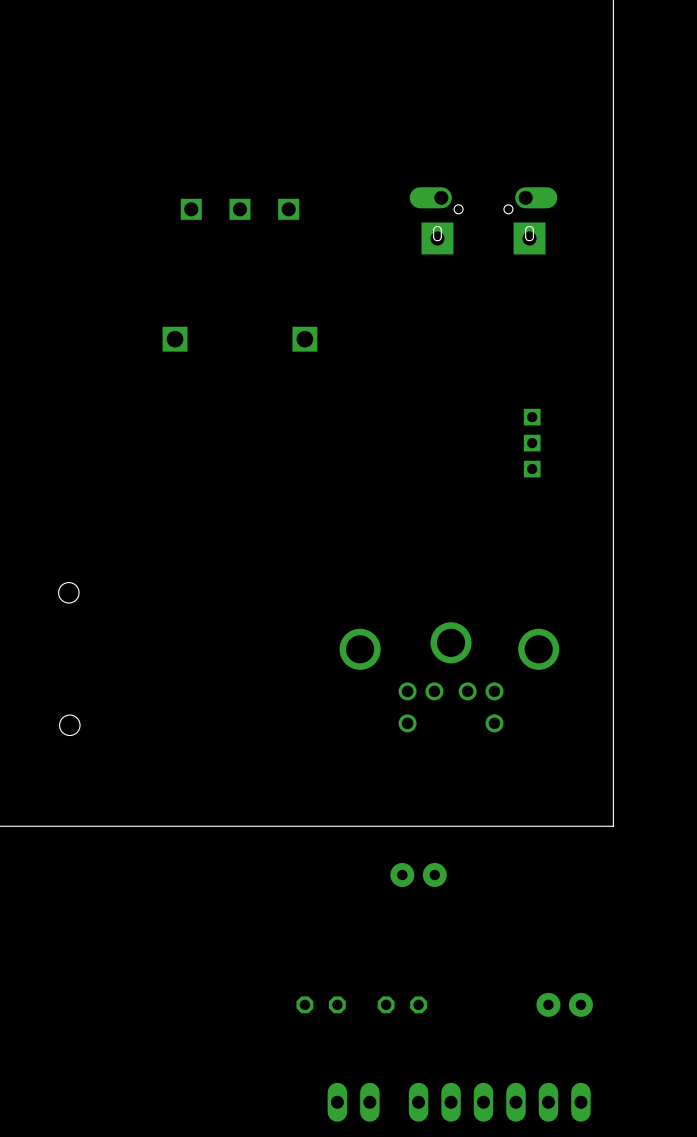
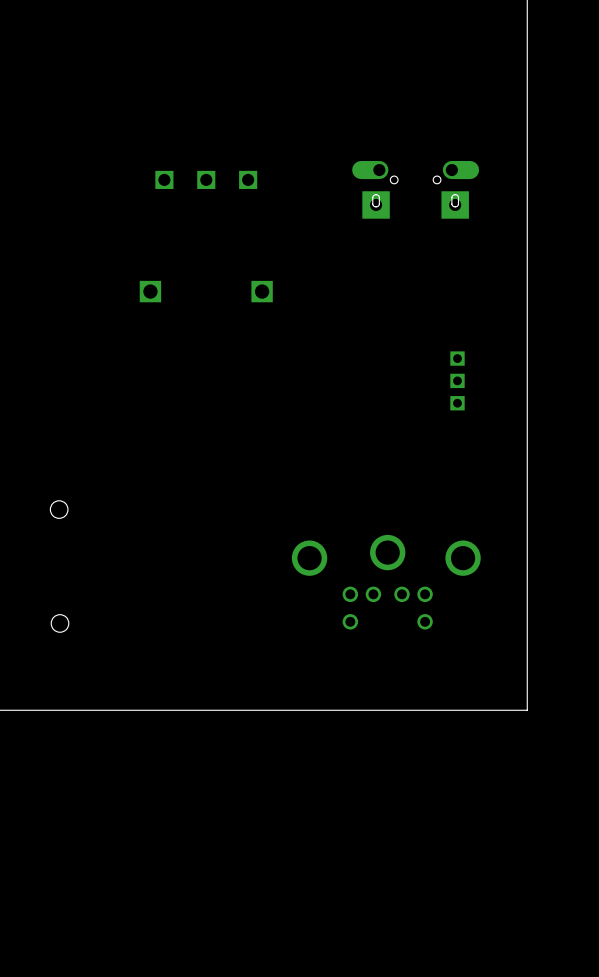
part: (418, 874) -> none
part: (321, 1004) -> none
part: (402, 1004) -> none
part: (564, 1004) -> none
part: (353, 1102) -> none
part: (499, 1102) -> none

